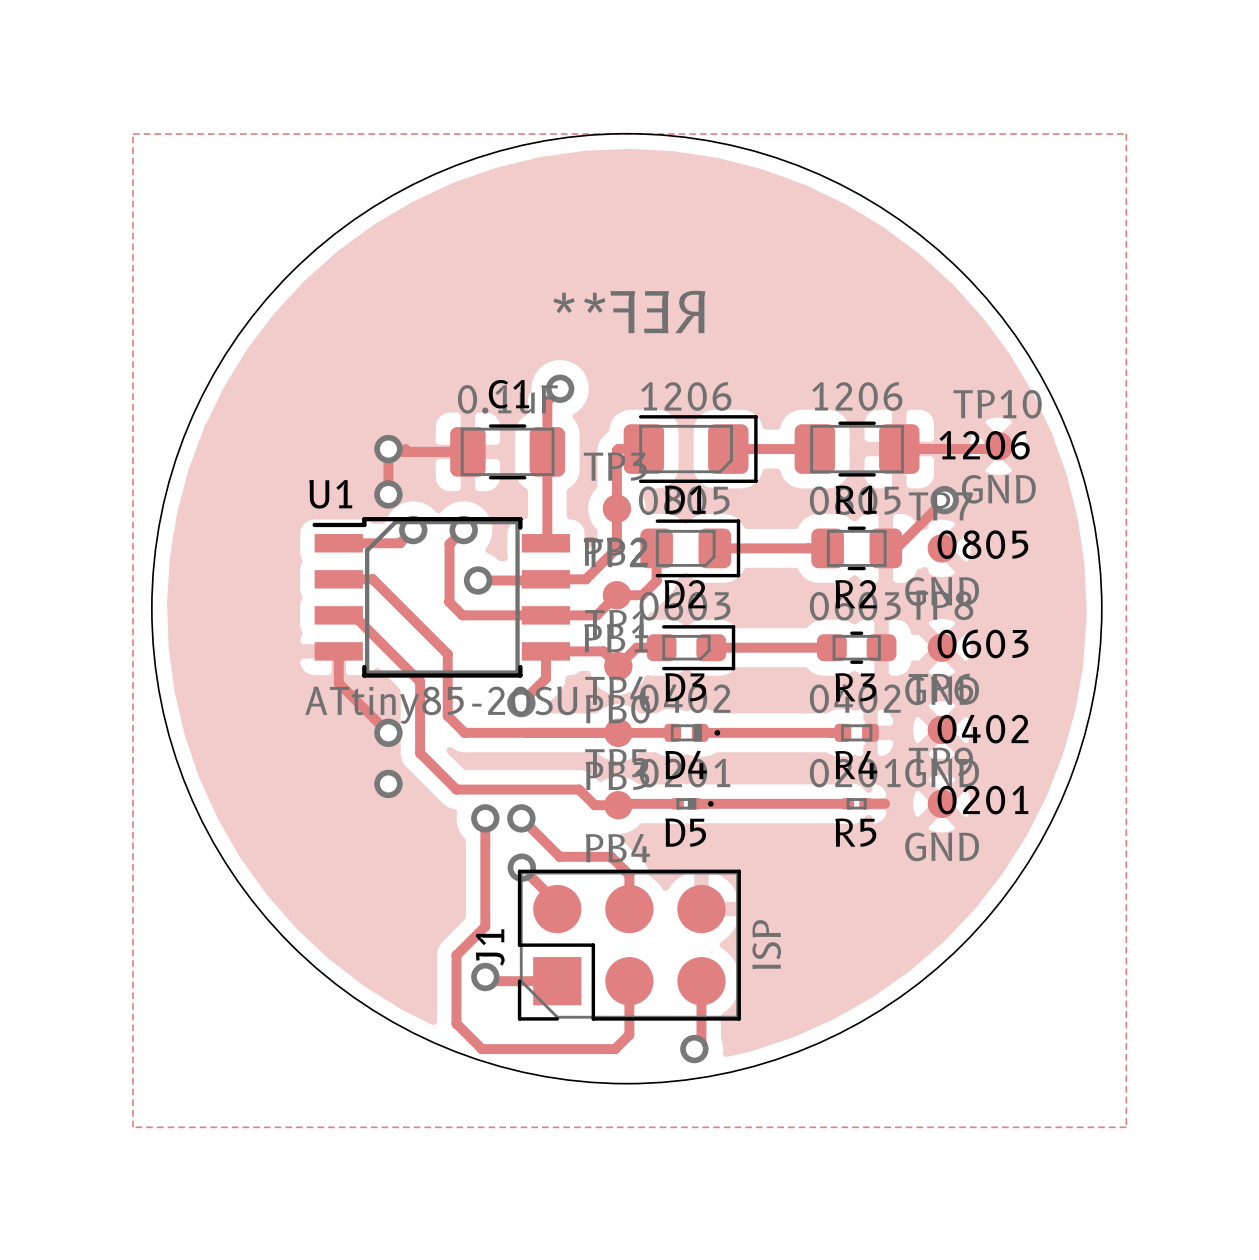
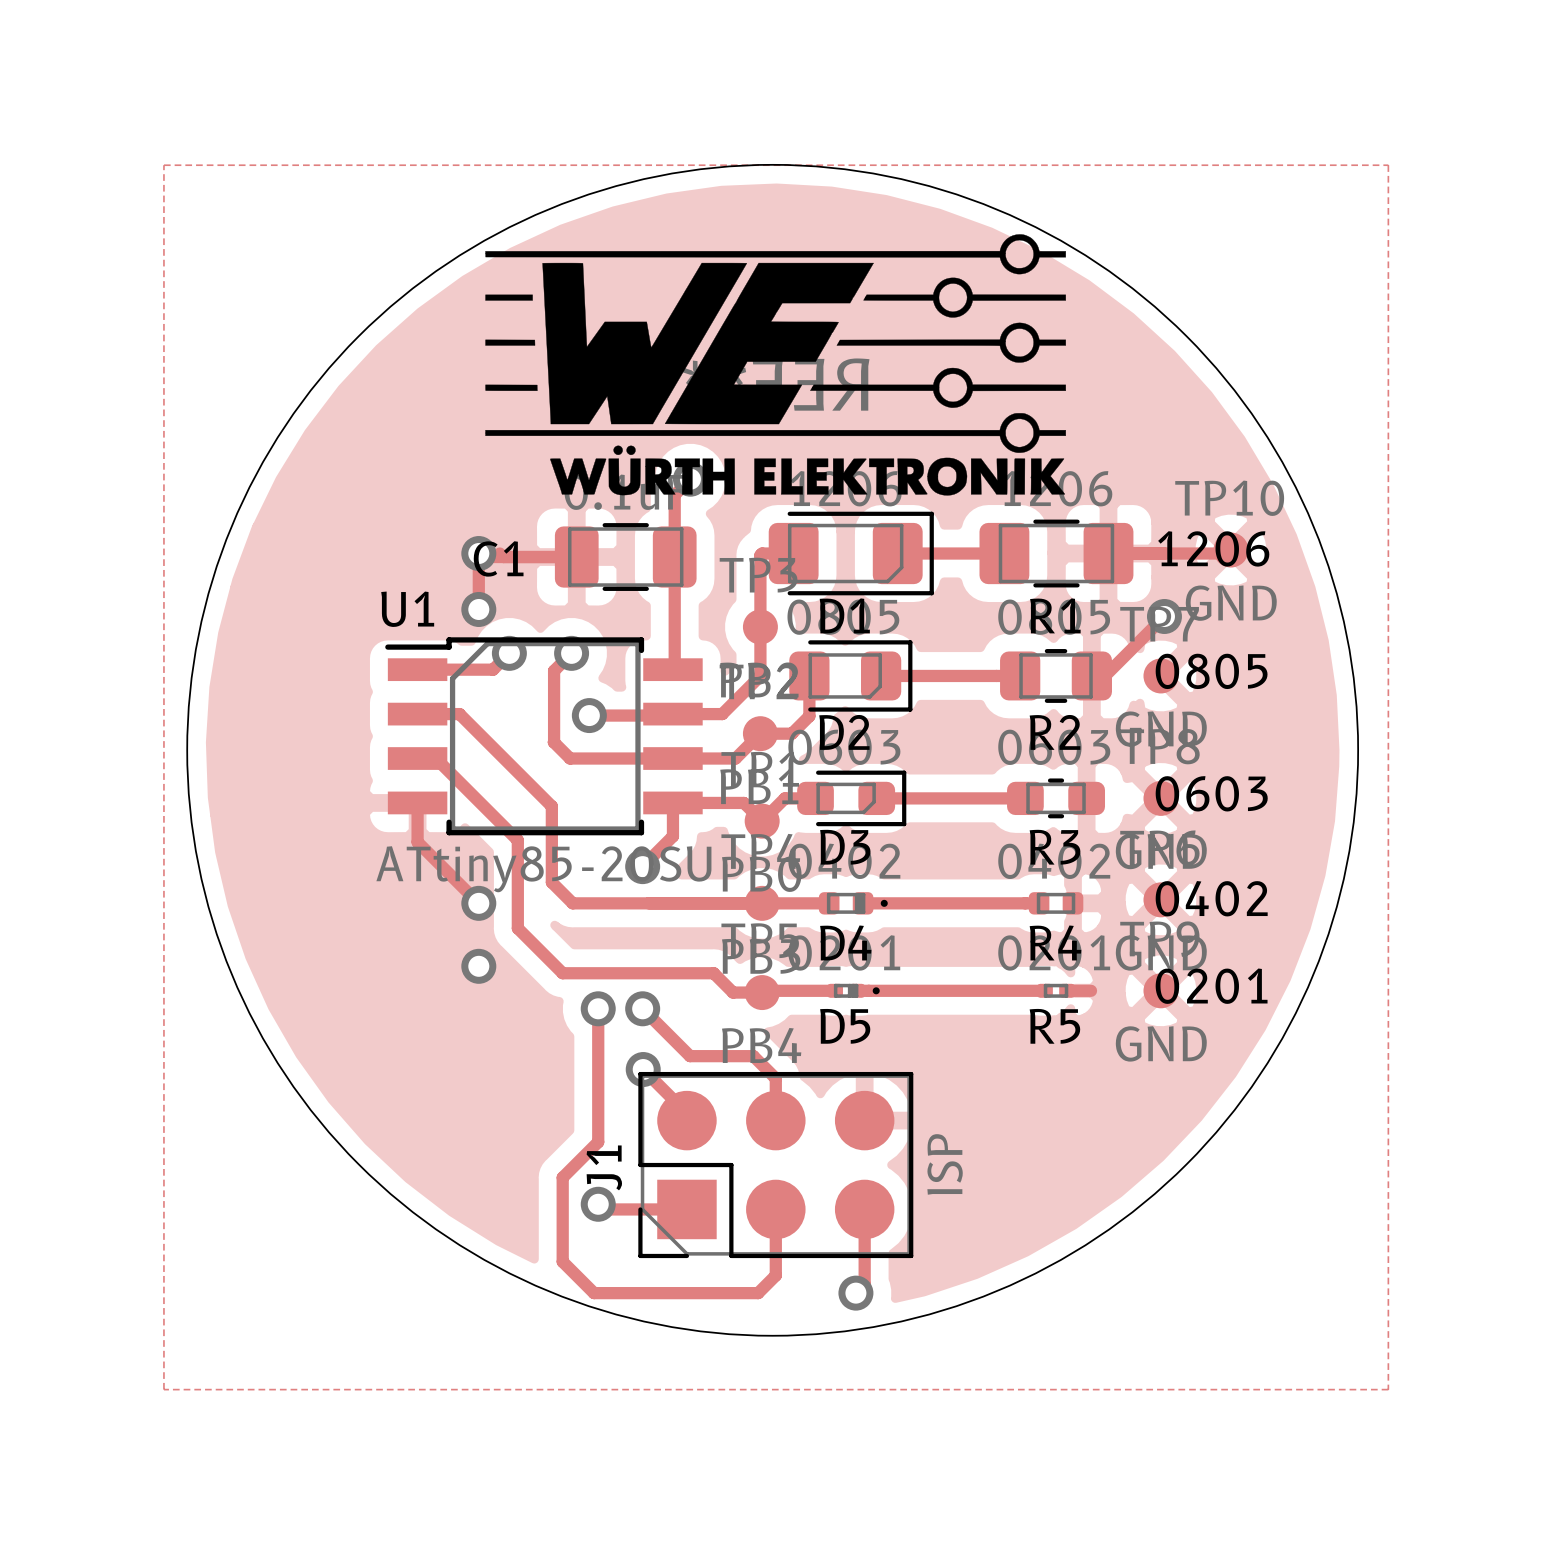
drawing: none -> [485, 234, 1066, 496]
C1 name position: C1 (508, 394) -> C1 (498, 558)

